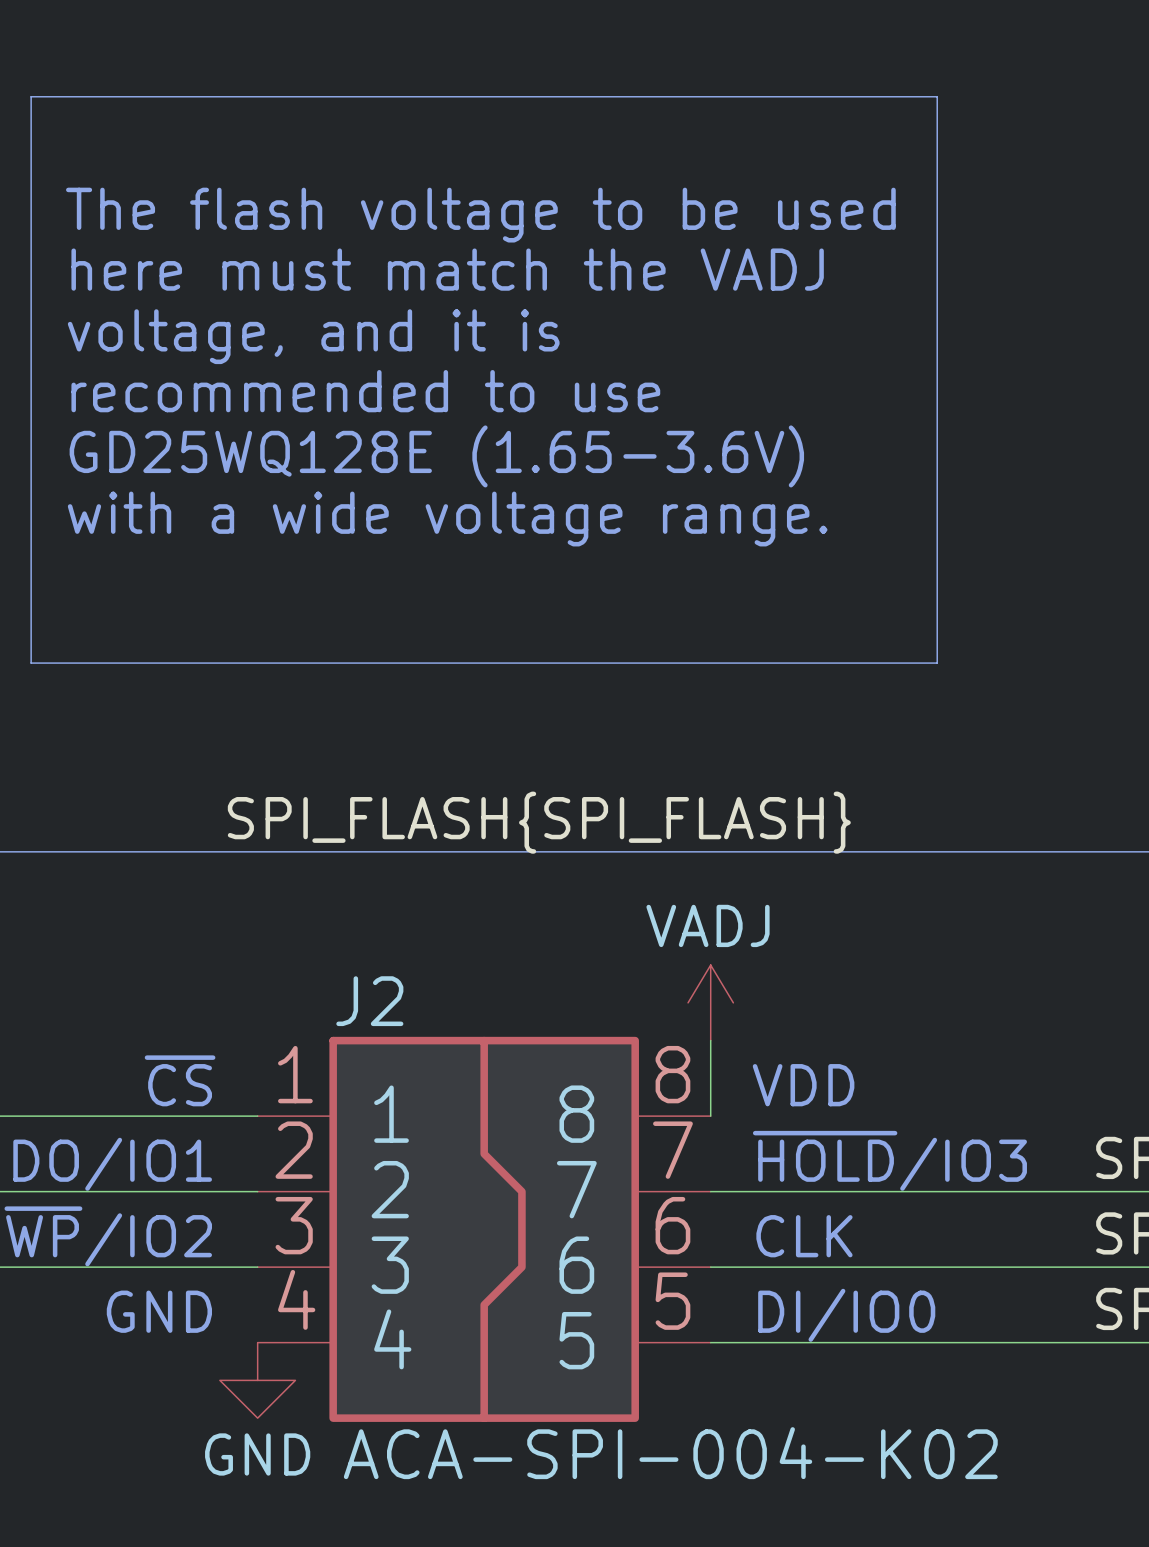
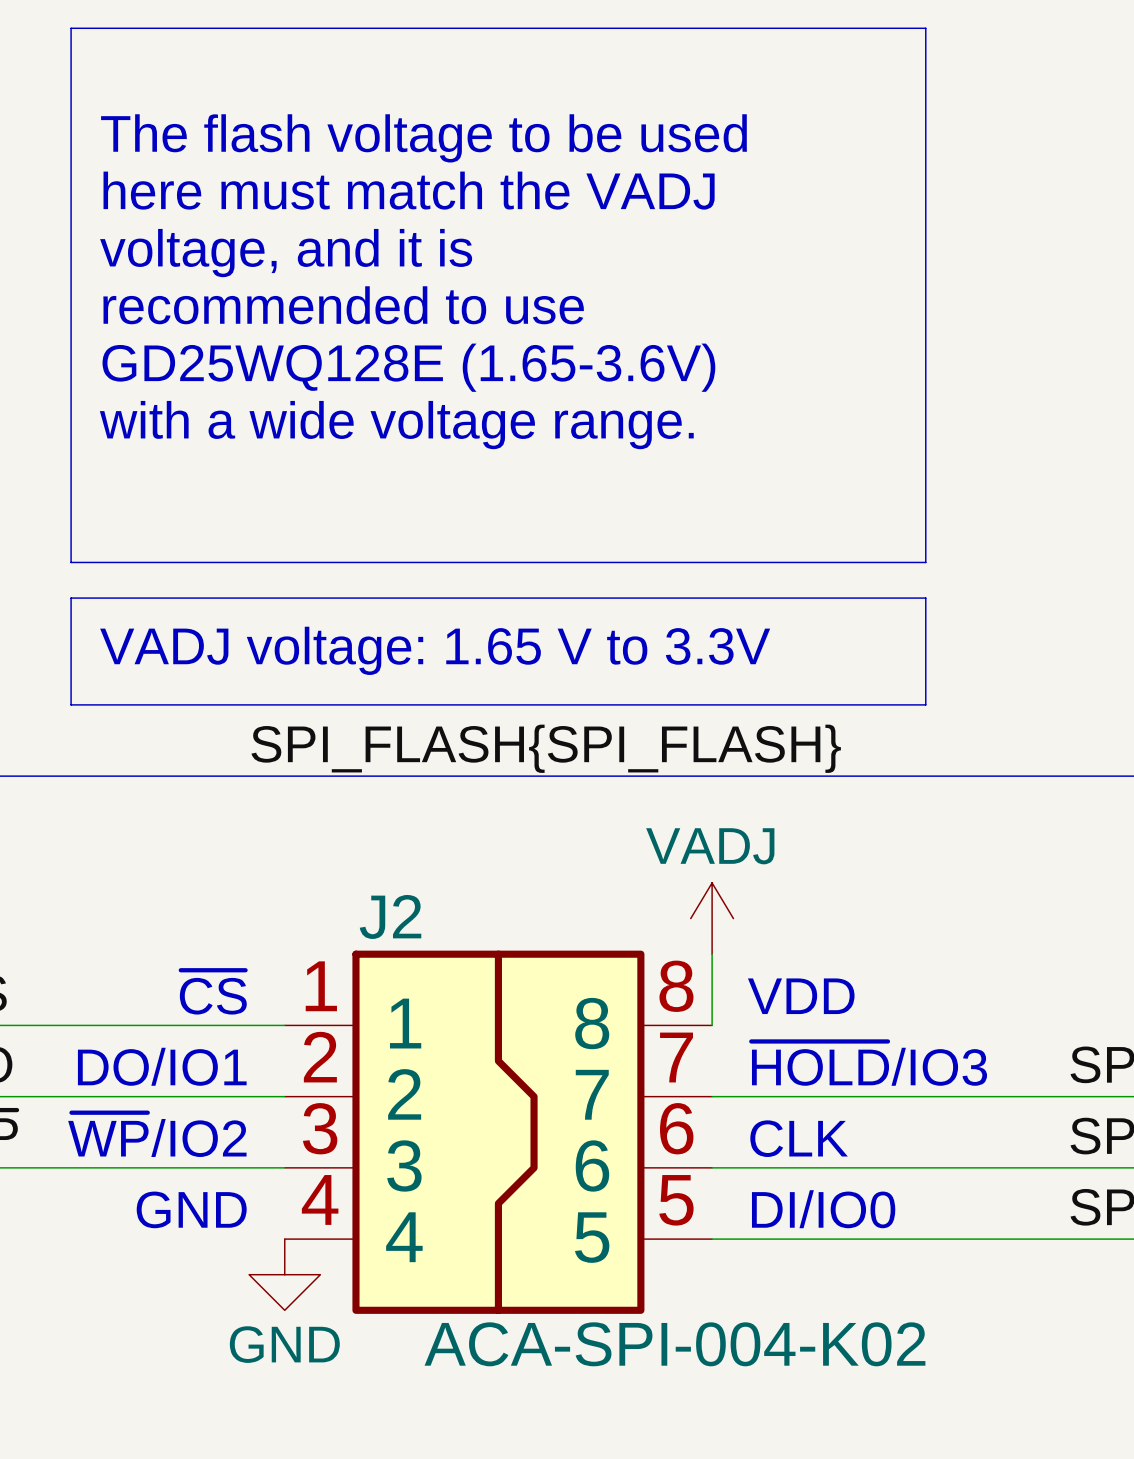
line: (31, 96) (937, 96) -> (71, 63) (71, 28) (925, 28) (925, 63)
text position: The flash voltage to be used (480, 215) -> The flash voltage to be used (424, 138)
text position: here must match the VADJ (447, 269) -> here must match the VADJ (409, 190)
text position: voltage, and it is (313, 336) -> voltage, and it is (286, 253)
text position: recommended to use (365, 391) -> recommended to use (343, 305)
text position: GD25WQ128E (1.65-3.6V) (436, 456) -> GD25WQ128E (1.65-3.6V) (408, 367)
text position: with a wide voltage range. (447, 519) -> with a wide voltage range. (396, 425)
line: (31, 625) (31, 663) -> (71, 562) (925, 562)
line: (937, 625) (937, 663) -> (71, 598) (71, 704) (925, 704) (925, 598)
text: none -> VADJ voltage: 1.65 V to 3.3V (435, 650)

